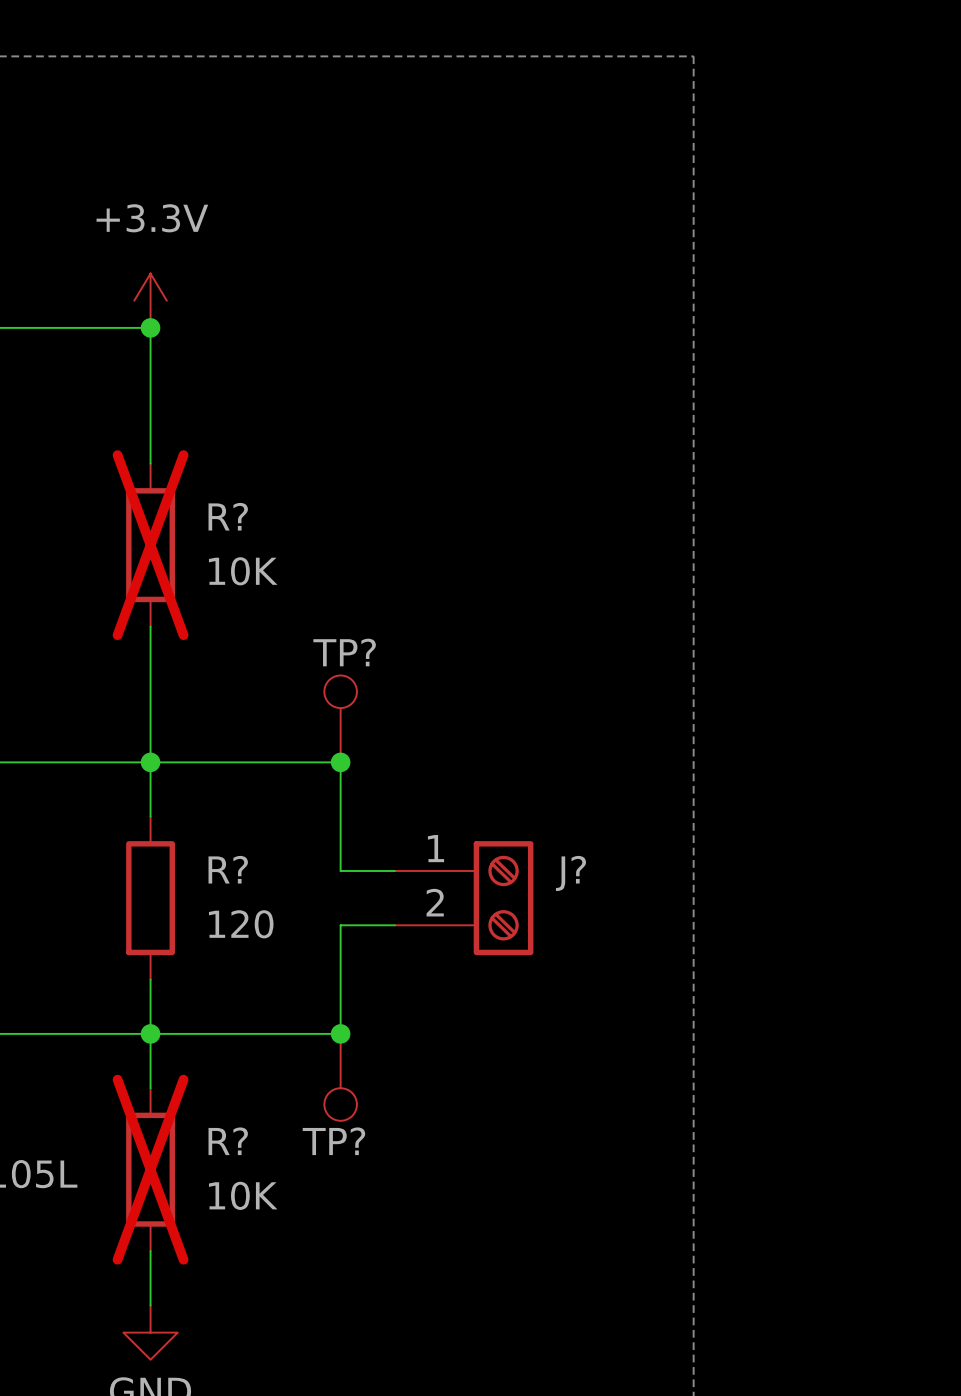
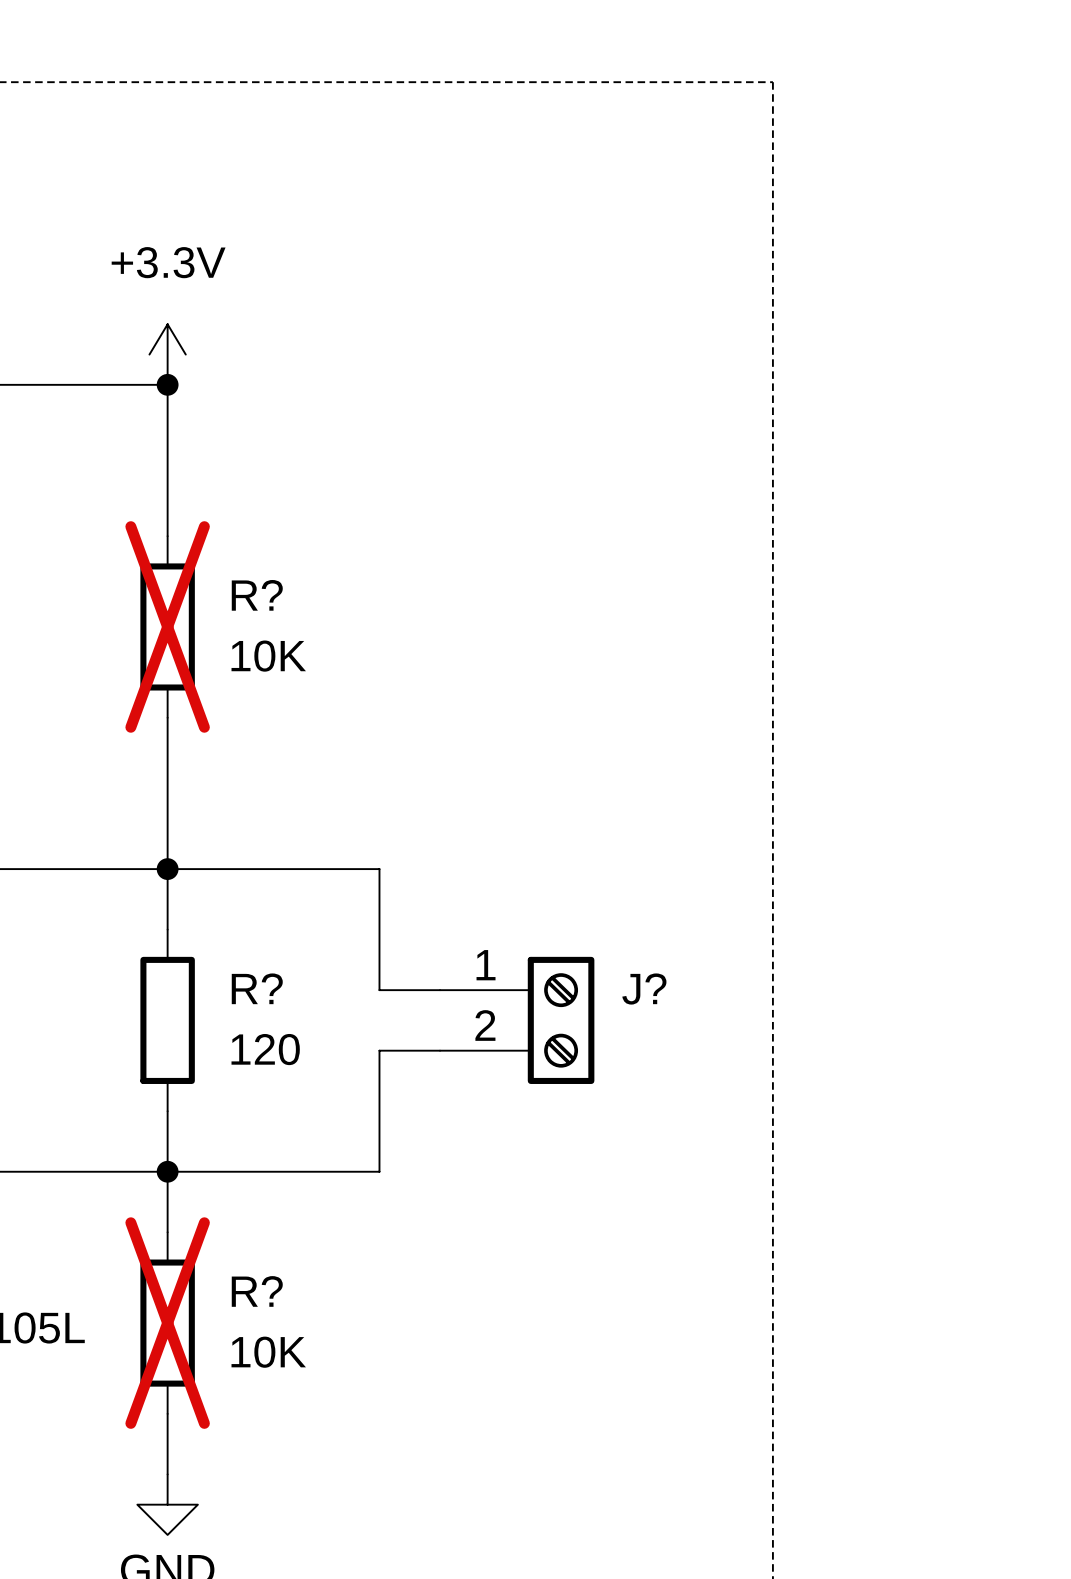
TP?: (340, 718) -> none
junction: (340, 762) -> none
junction: (340, 1033) -> none
TP?: (340, 1077) -> none

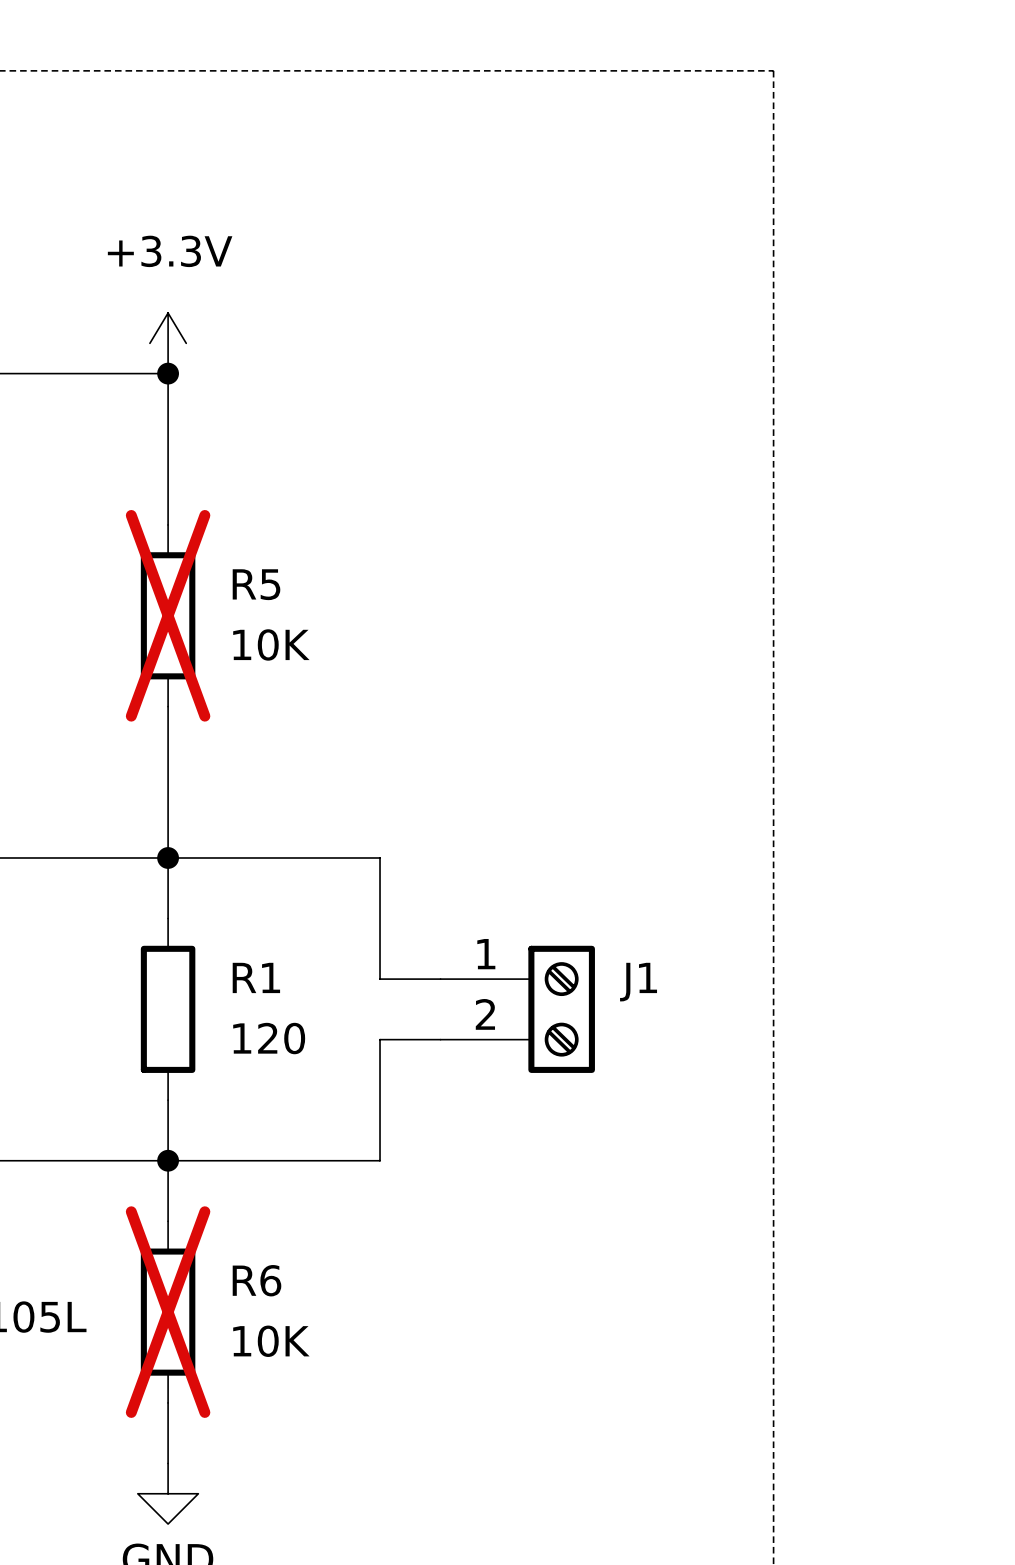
R? name: R? (257, 595) -> R5 (256, 584)
R? name: R? (257, 988) -> R1 (256, 977)
J? name: J? (644, 989) -> J1 (638, 982)
R? name: R? (257, 1291) -> R6 (257, 1280)

